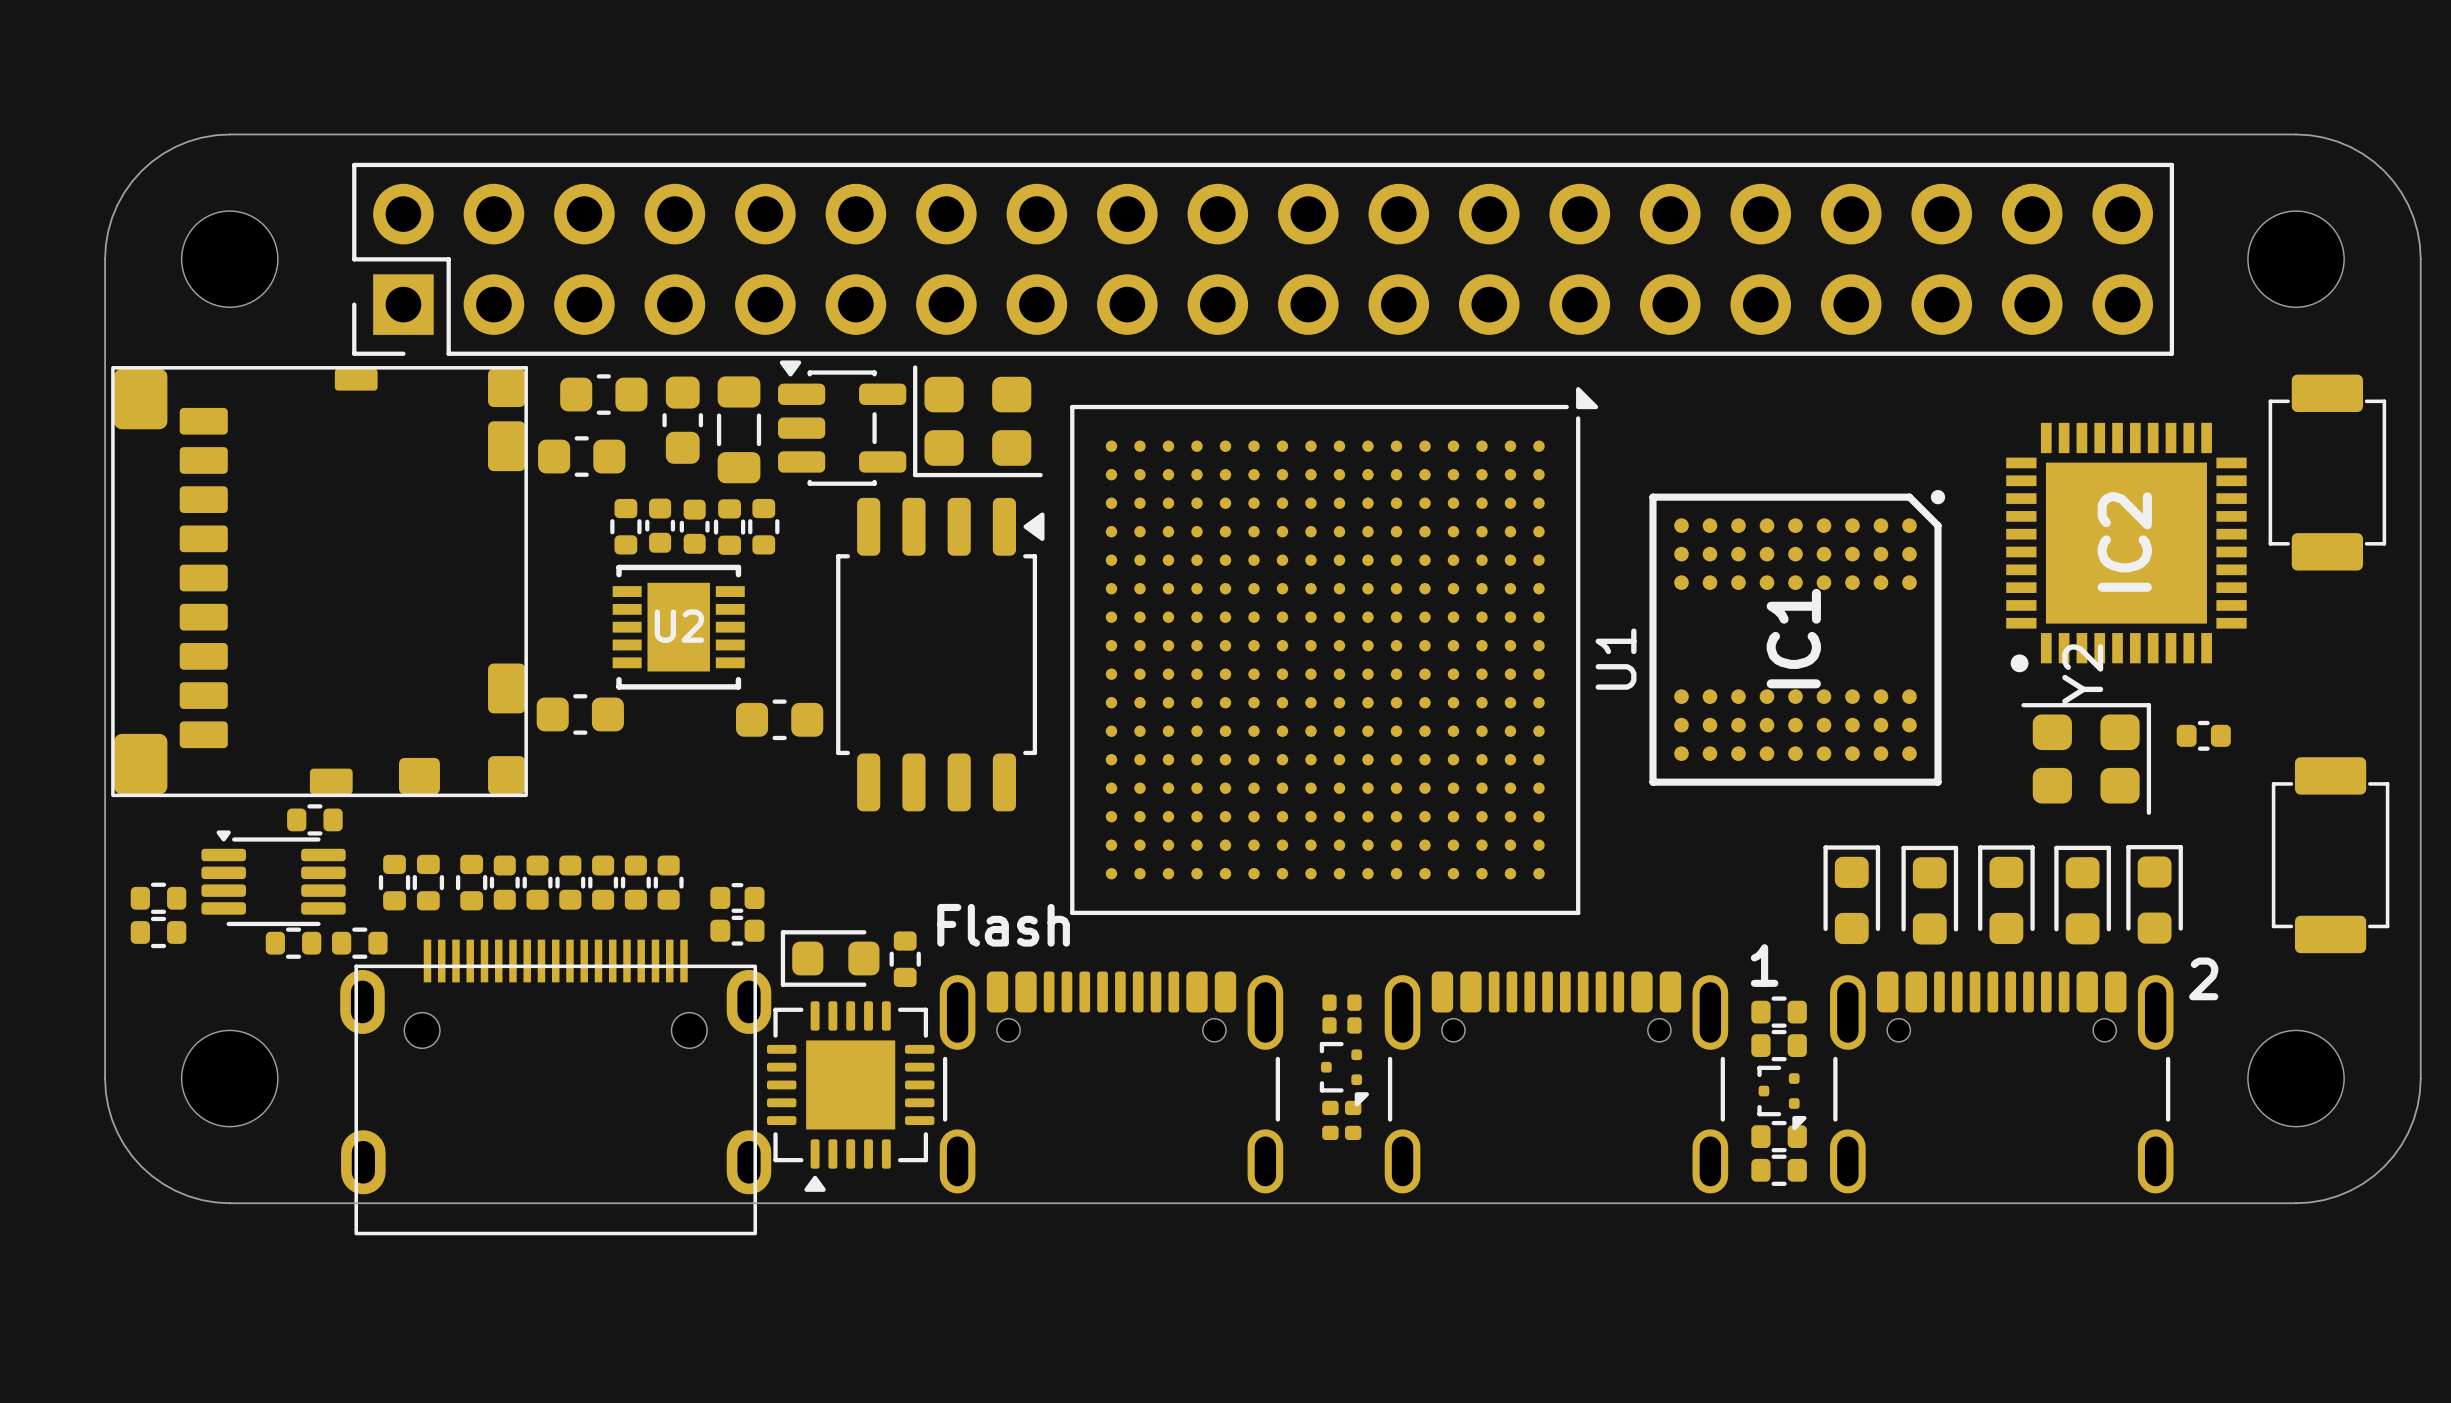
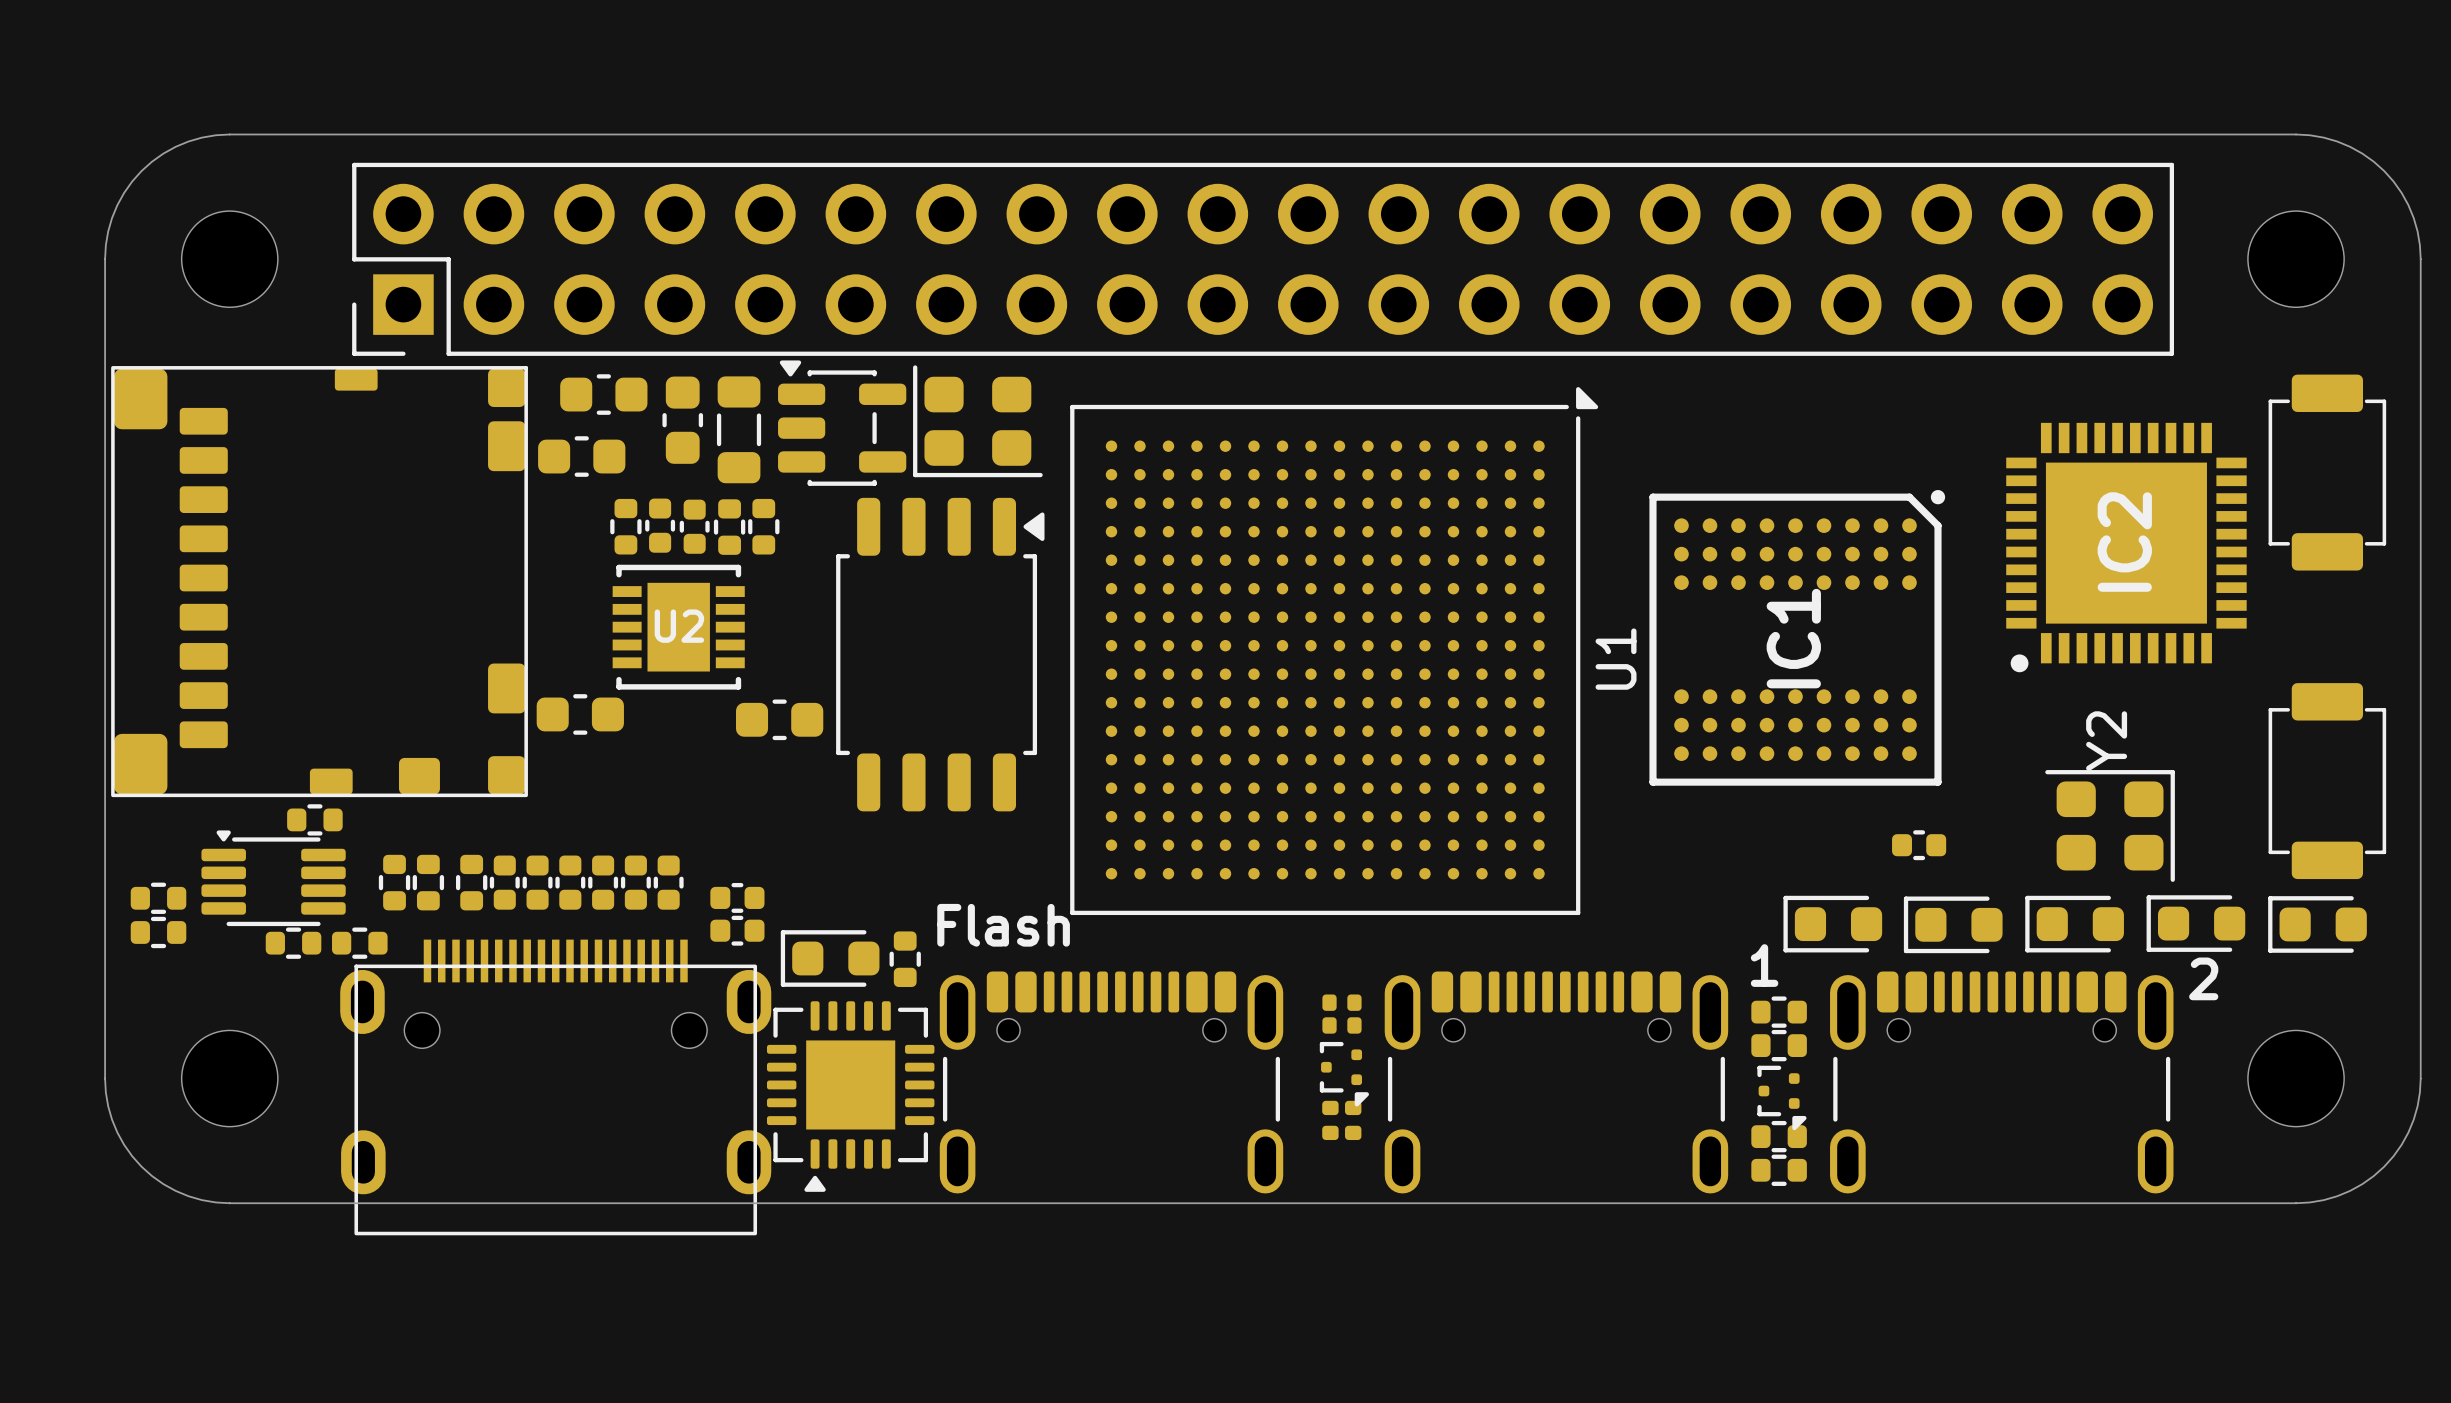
part position: (2203, 735) -> (1919, 845)
Y2 position: (2086, 758) -> (2110, 825)
part position: (2330, 855) -> (2327, 781)
part rotation: 0° (1851, 894) -> 90° counterclockwise (1832, 924)
part: (2006, 894) -> none
part rotation: 0° (2154, 894) -> 90° counterclockwise (2195, 923)
part: (1929, 895) -> none
part rotation: 0° (2082, 895) -> 90° counterclockwise (2074, 924)
part: none -> (1953, 924)
part: none -> (2317, 924)

